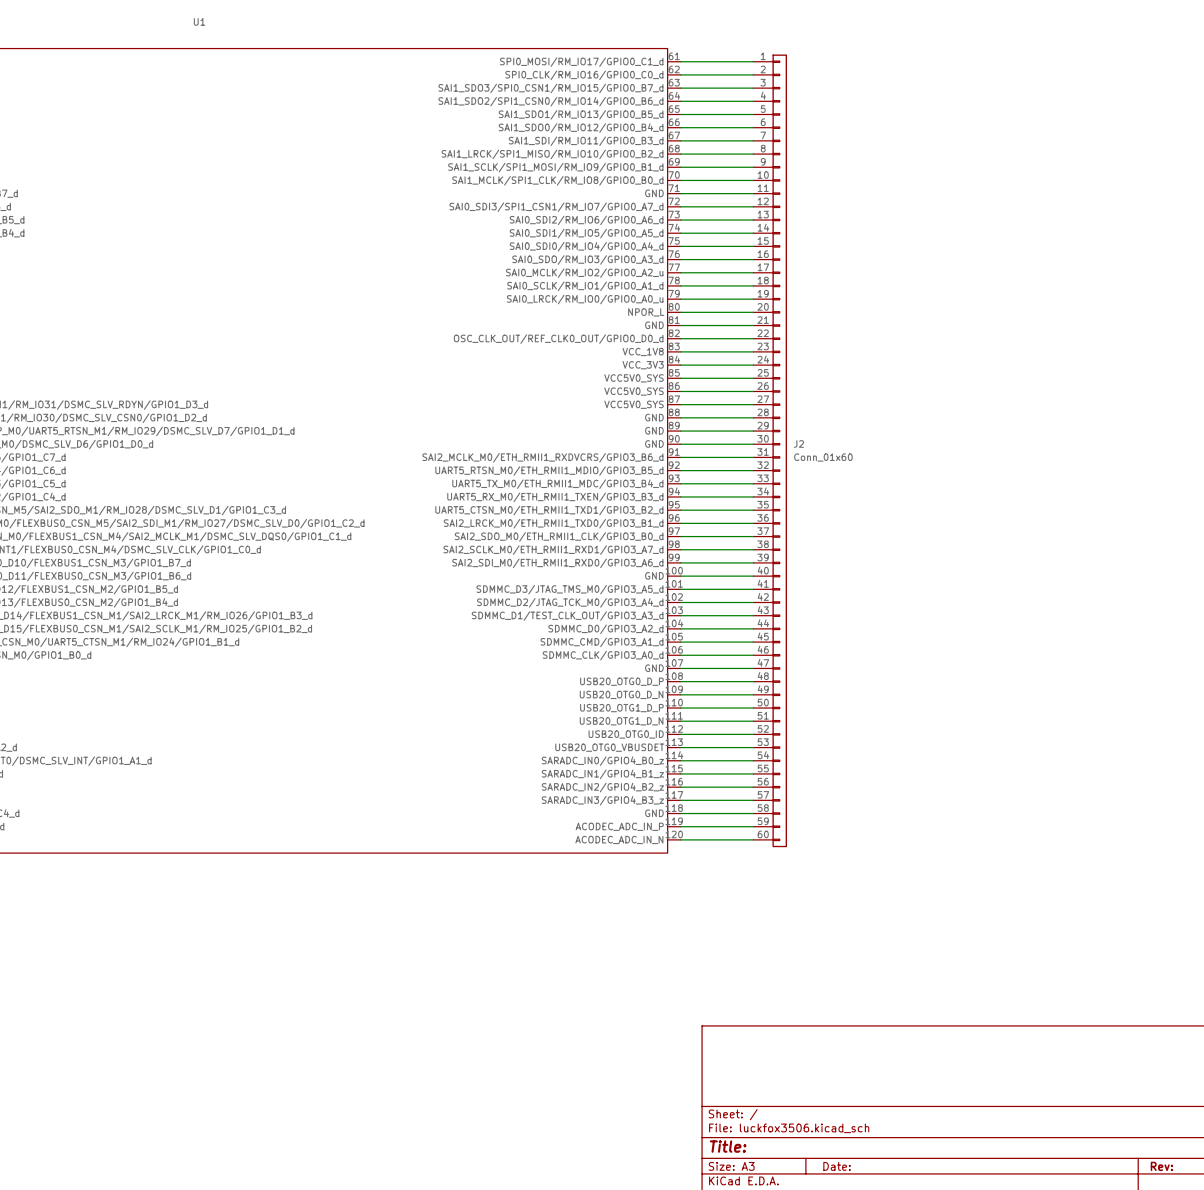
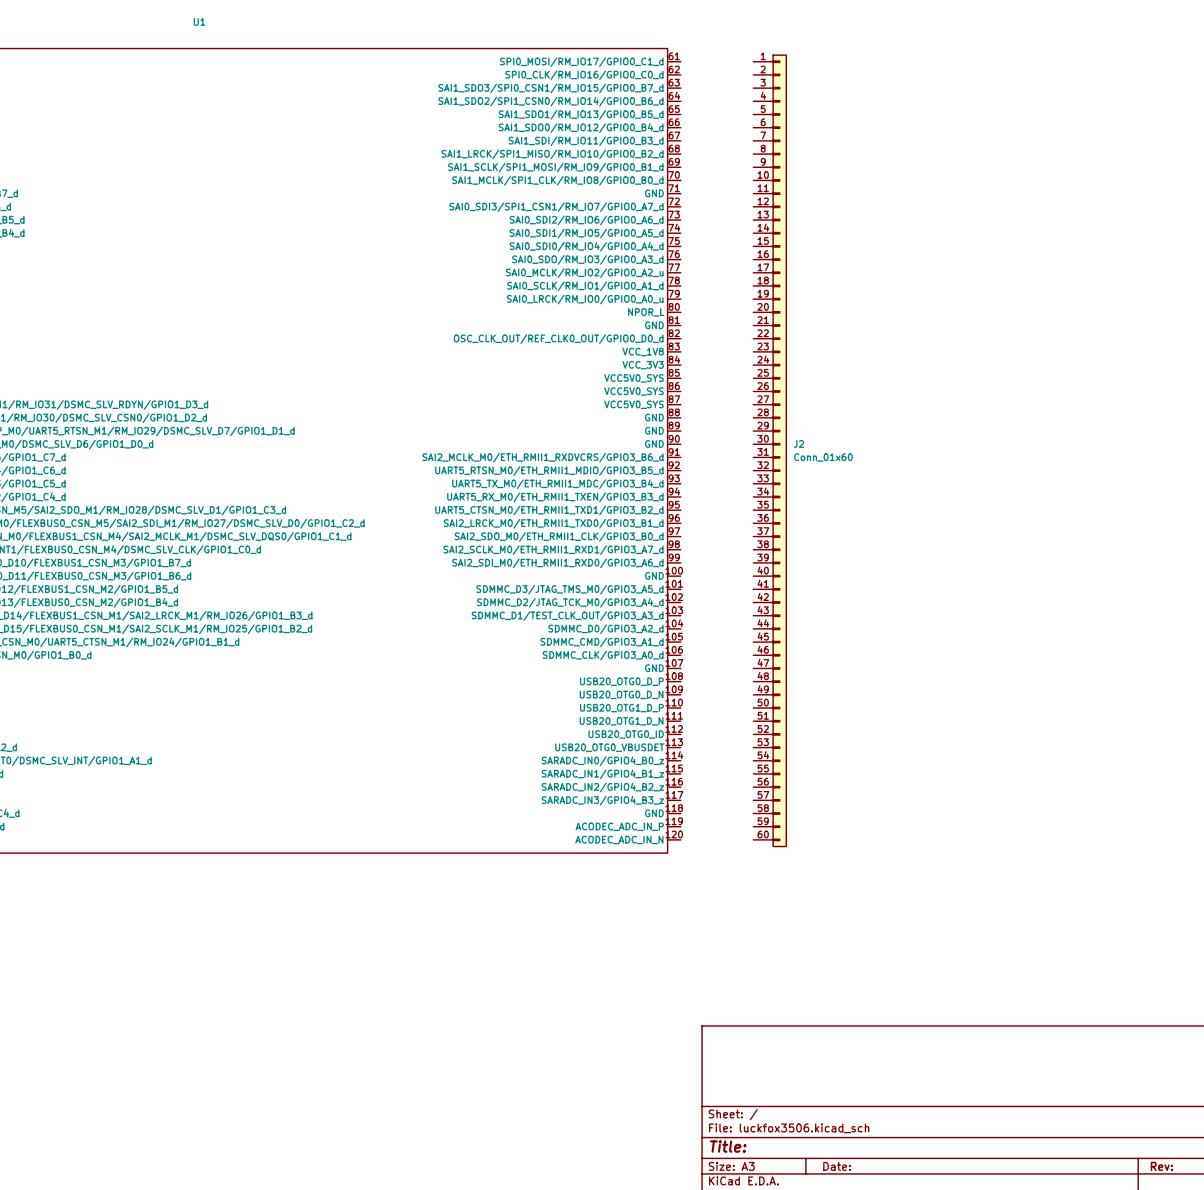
wire: (680, 61) (753, 61) -> none
wire: (680, 74) (753, 74) -> none
wire: (680, 88) (753, 88) -> none
wire: (680, 101) (753, 101) -> none
wire: (680, 114) (753, 114) -> none
wire: (680, 127) (753, 127) -> none
wire: (680, 140) (753, 140) -> none
wire: (680, 154) (753, 154) -> none
wire: (680, 167) (753, 167) -> none
wire: (680, 180) (753, 180) -> none
wire: (680, 193) (753, 193) -> none
wire: (680, 206) (753, 206) -> none
wire: (680, 220) (753, 220) -> none
wire: (680, 233) (753, 233) -> none
wire: (680, 246) (753, 246) -> none
wire: (680, 259) (753, 259) -> none
wire: (680, 272) (753, 272) -> none
wire: (680, 285) (753, 285) -> none
wire: (680, 299) (753, 299) -> none
wire: (680, 312) (753, 312) -> none
wire: (680, 325) (753, 325) -> none
wire: (680, 338) (753, 338) -> none
wire: (680, 351) (753, 351) -> none
wire: (680, 365) (753, 365) -> none
wire: (680, 378) (753, 378) -> none
wire: (680, 391) (753, 391) -> none
wire: (680, 404) (753, 404) -> none
wire: (680, 417) (753, 417) -> none
wire: (680, 431) (753, 431) -> none
wire: (680, 444) (753, 444) -> none
wire: (680, 457) (753, 457) -> none
wire: (680, 470) (753, 470) -> none
wire: (680, 483) (753, 483) -> none
wire: (680, 496) (753, 496) -> none
wire: (680, 510) (753, 510) -> none
wire: (680, 523) (753, 523) -> none
wire: (680, 536) (753, 536) -> none
wire: (680, 549) (753, 549) -> none
wire: (680, 562) (753, 562) -> none
wire: (680, 576) (753, 576) -> none
wire: (680, 589) (753, 589) -> none
wire: (680, 602) (753, 602) -> none
wire: (680, 615) (753, 615) -> none
wire: (680, 628) (753, 628) -> none
wire: (680, 642) (753, 642) -> none
wire: (680, 655) (753, 655) -> none
wire: (680, 668) (753, 668) -> none
wire: (680, 681) (753, 681) -> none
wire: (680, 694) (753, 694) -> none
wire: (680, 708) (753, 708) -> none
wire: (680, 721) (753, 721) -> none
wire: (680, 734) (753, 734) -> none
wire: (680, 747) (753, 747) -> none
wire: (680, 760) (753, 760) -> none
wire: (680, 773) (753, 773) -> none
wire: (680, 787) (753, 787) -> none
wire: (680, 800) (753, 800) -> none
wire: (680, 813) (753, 813) -> none
wire: (680, 826) (753, 826) -> none
wire: (680, 839) (753, 839) -> none

